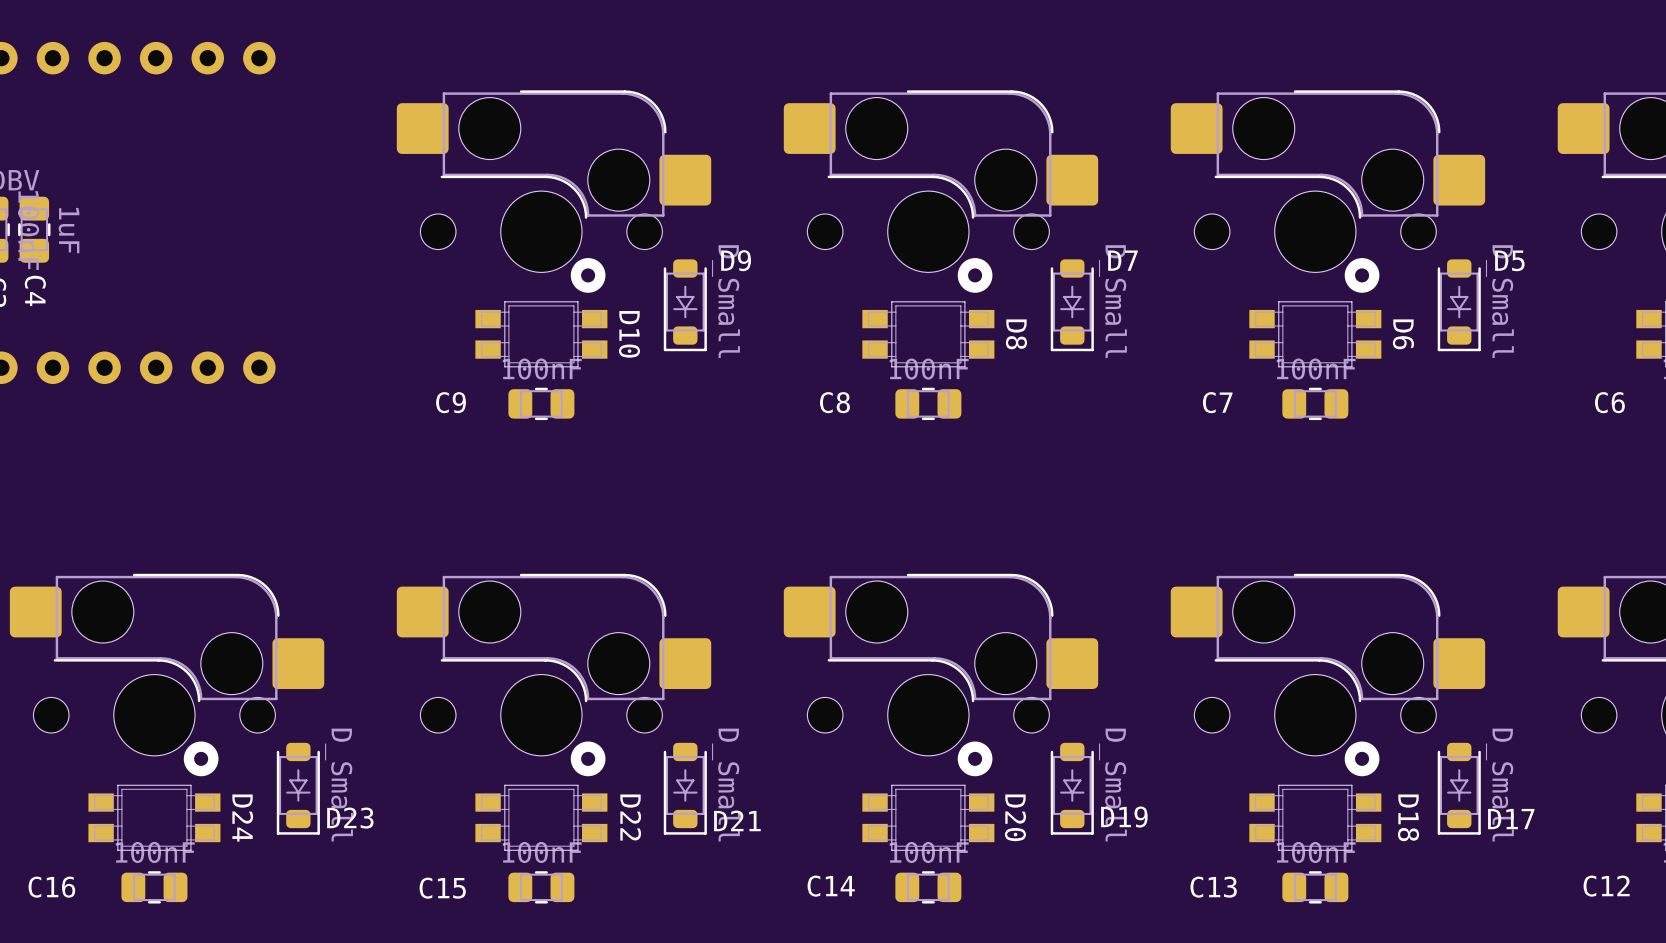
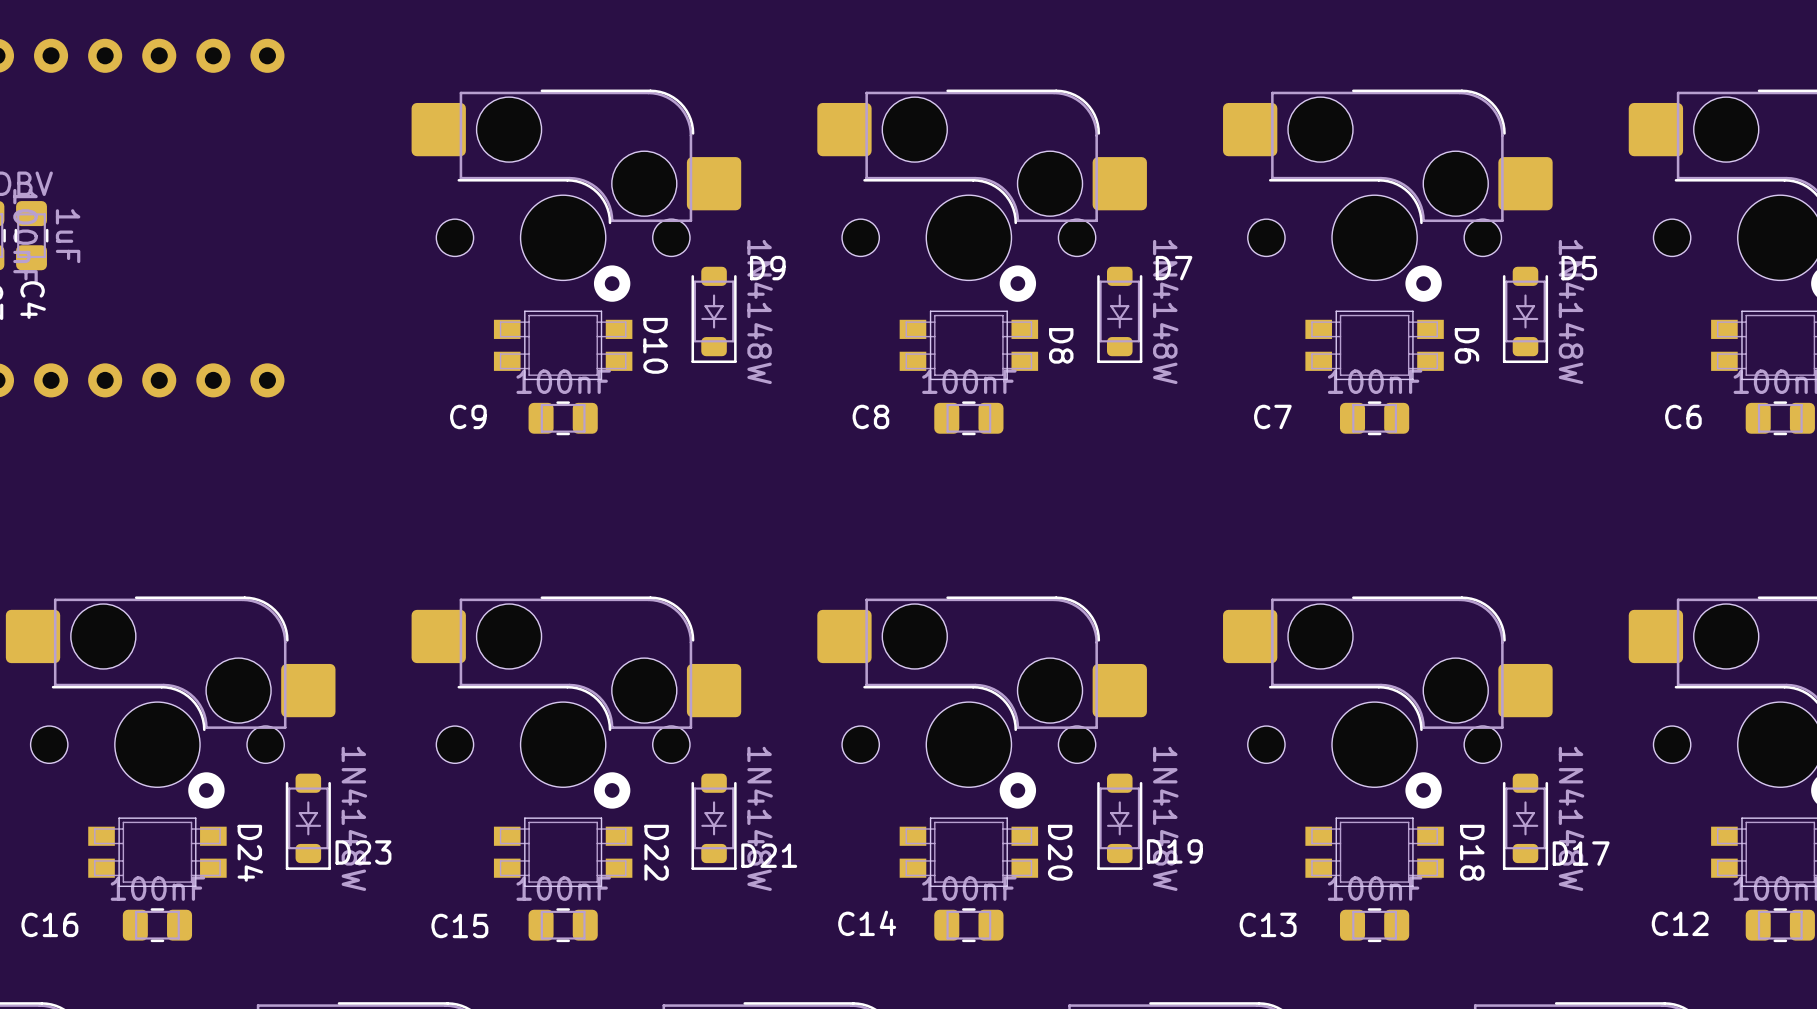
D9 value: D_Small (725, 301) -> 1N4148W (760, 311)
D7 value: D_Small (1112, 301) -> 1N4148W (1165, 311)
D5 value: D_Small (1499, 301) -> 1N4148W (1571, 311)
D23 value: D_Small (338, 785) -> 1N4148W (354, 818)
D21 value: D_Small (725, 785) -> 1N4148W (760, 818)
D19 value: D_Small (1112, 785) -> 1N4148W (1165, 818)
D17 value: D_Small (1499, 785) -> 1N4148W (1571, 818)

